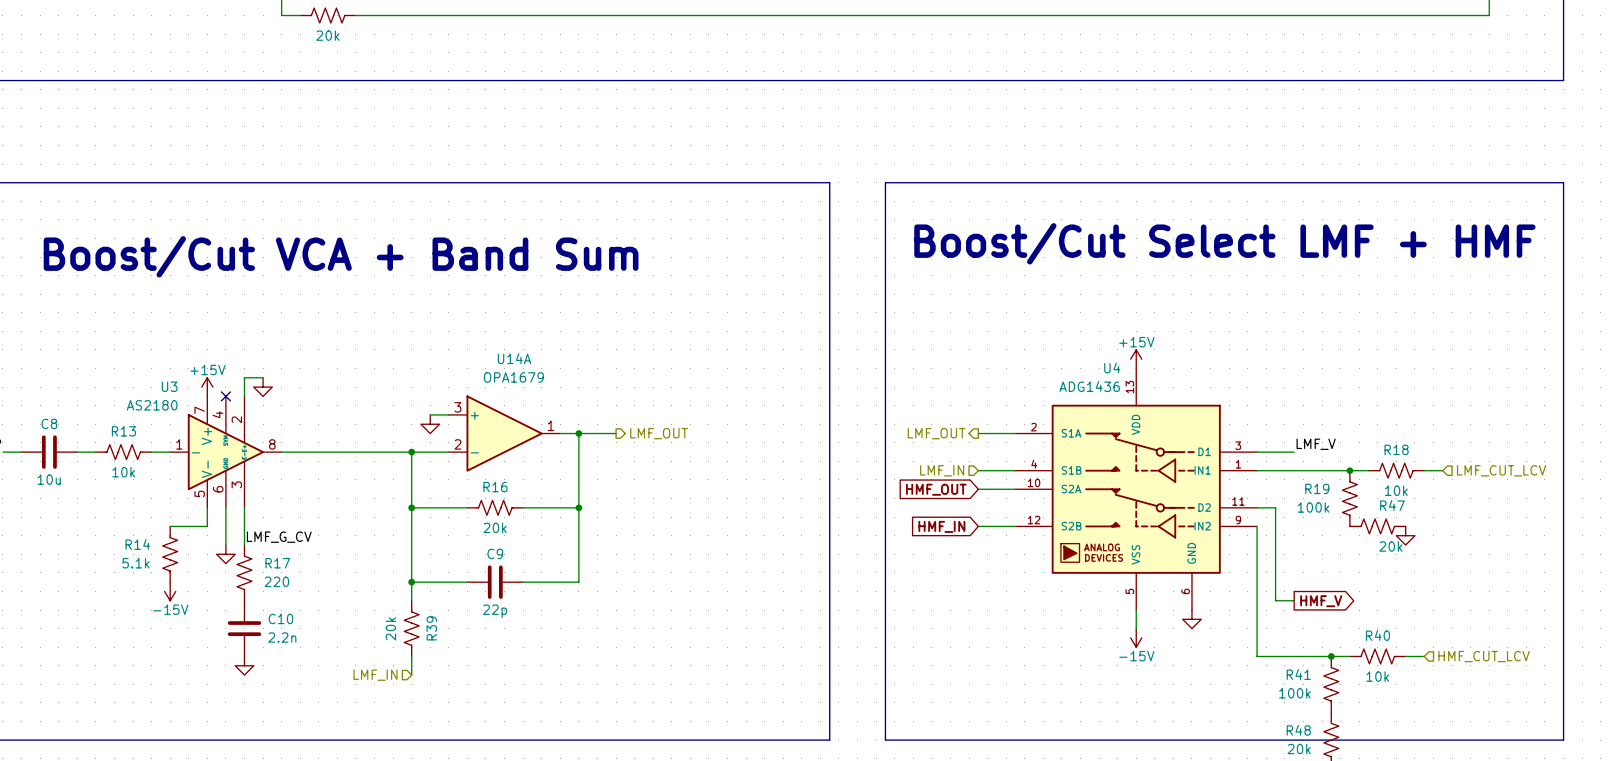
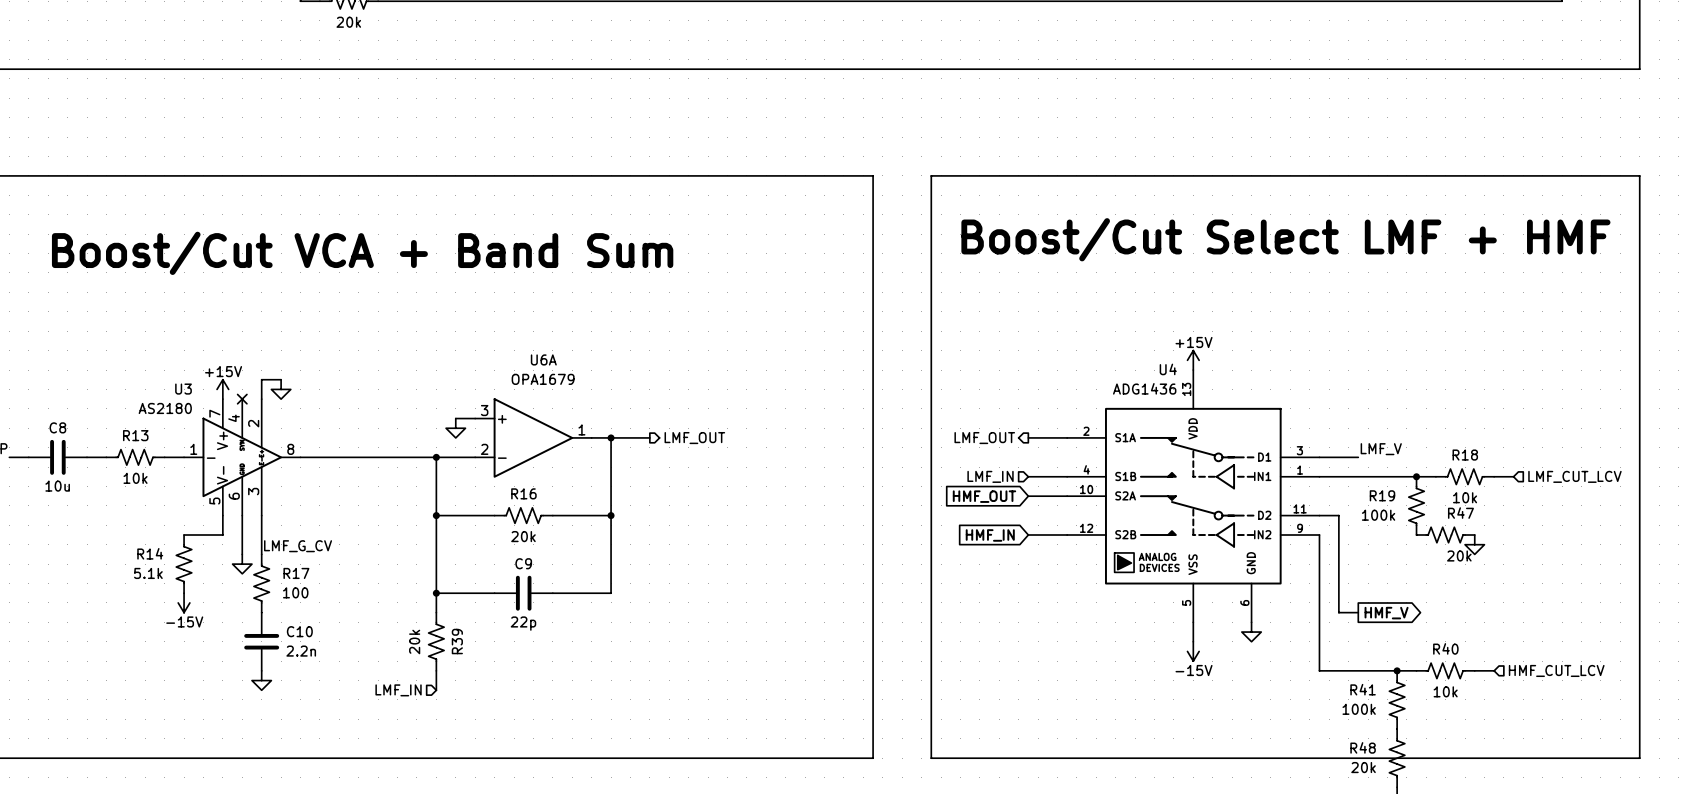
U14A name: U14A (514, 358) -> U6A (543, 359)
R17 value: 220 (276, 581) -> 100 (295, 592)

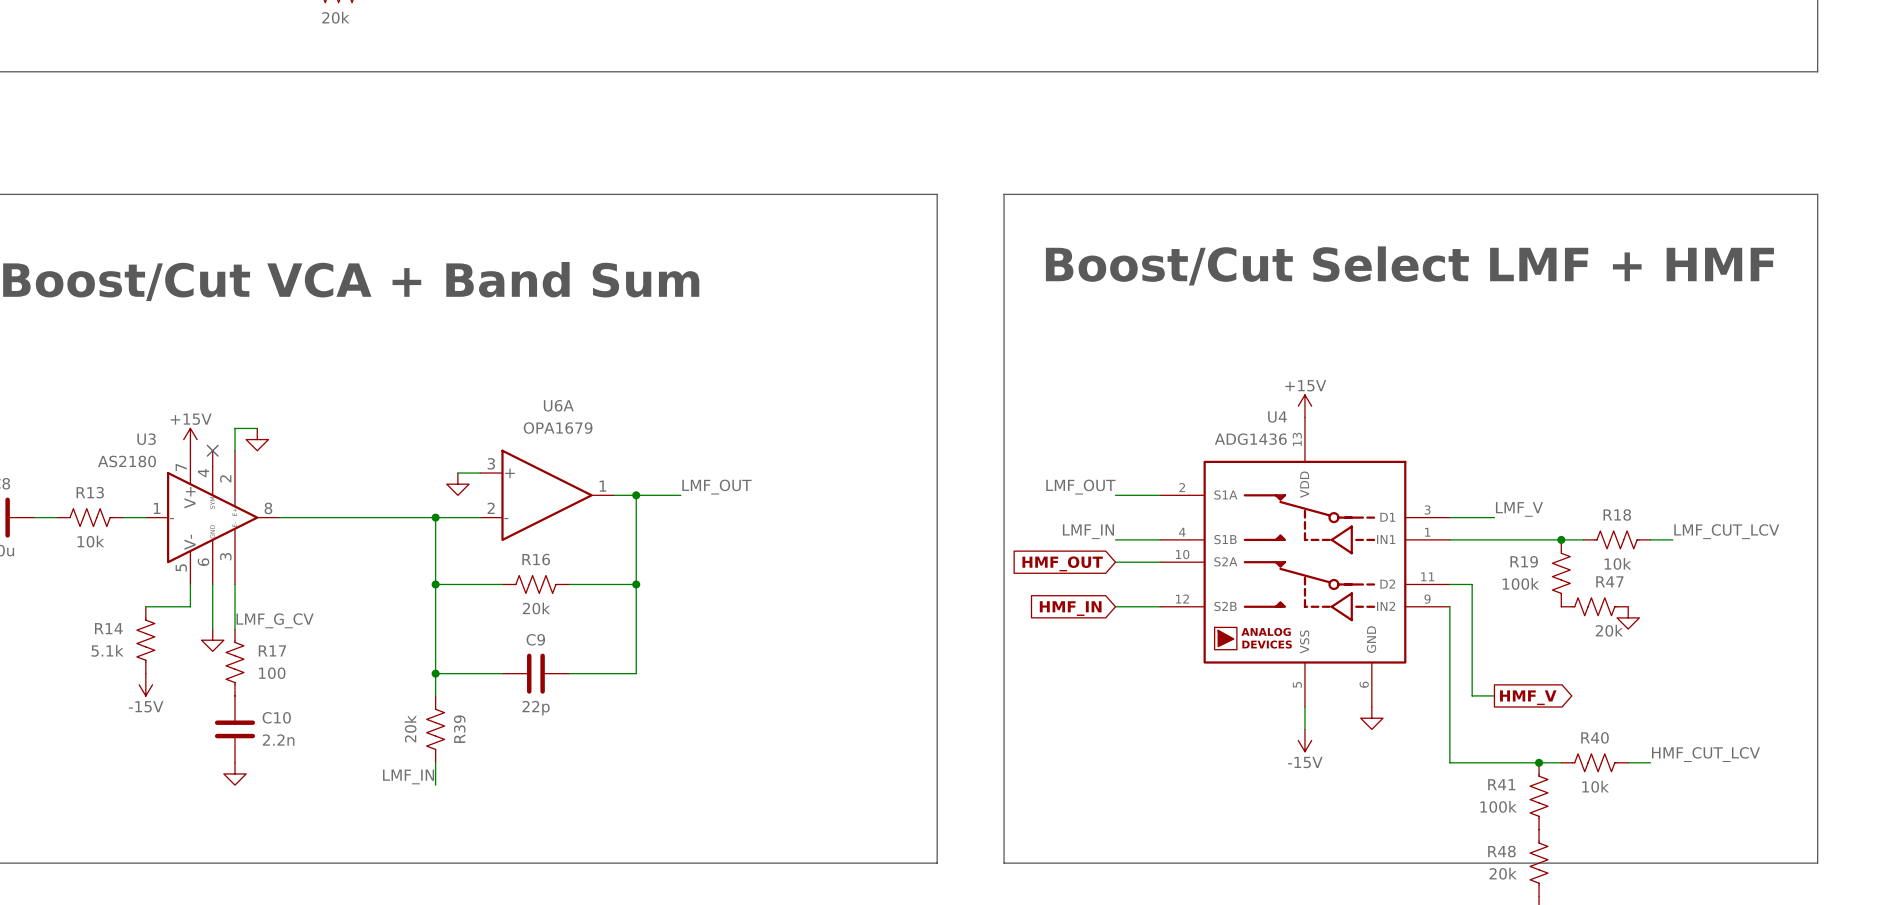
label: none -> LMF_OUT (716, 487)
label: none -> LMF_OUT (1080, 487)
hierarchical label: LMF_OUT (694, 438) -> none
hierarchical label: LMF_OUT (984, 438) -> none
label: none -> LMF_IN (1088, 531)
label: none -> LMF_CUT_LCV (1726, 531)
hierarchical label: LMF_IN (990, 476) -> none
hierarchical label: LMF_CUT_LCV (1574, 476) -> none
label: none -> HMF_CUT_LCV (1705, 754)
hierarchical label: HMF_CUT_LCV (1556, 670) -> none
label: none -> LMF_IN (408, 776)
hierarchical label: LMF_IN (398, 690) -> none

